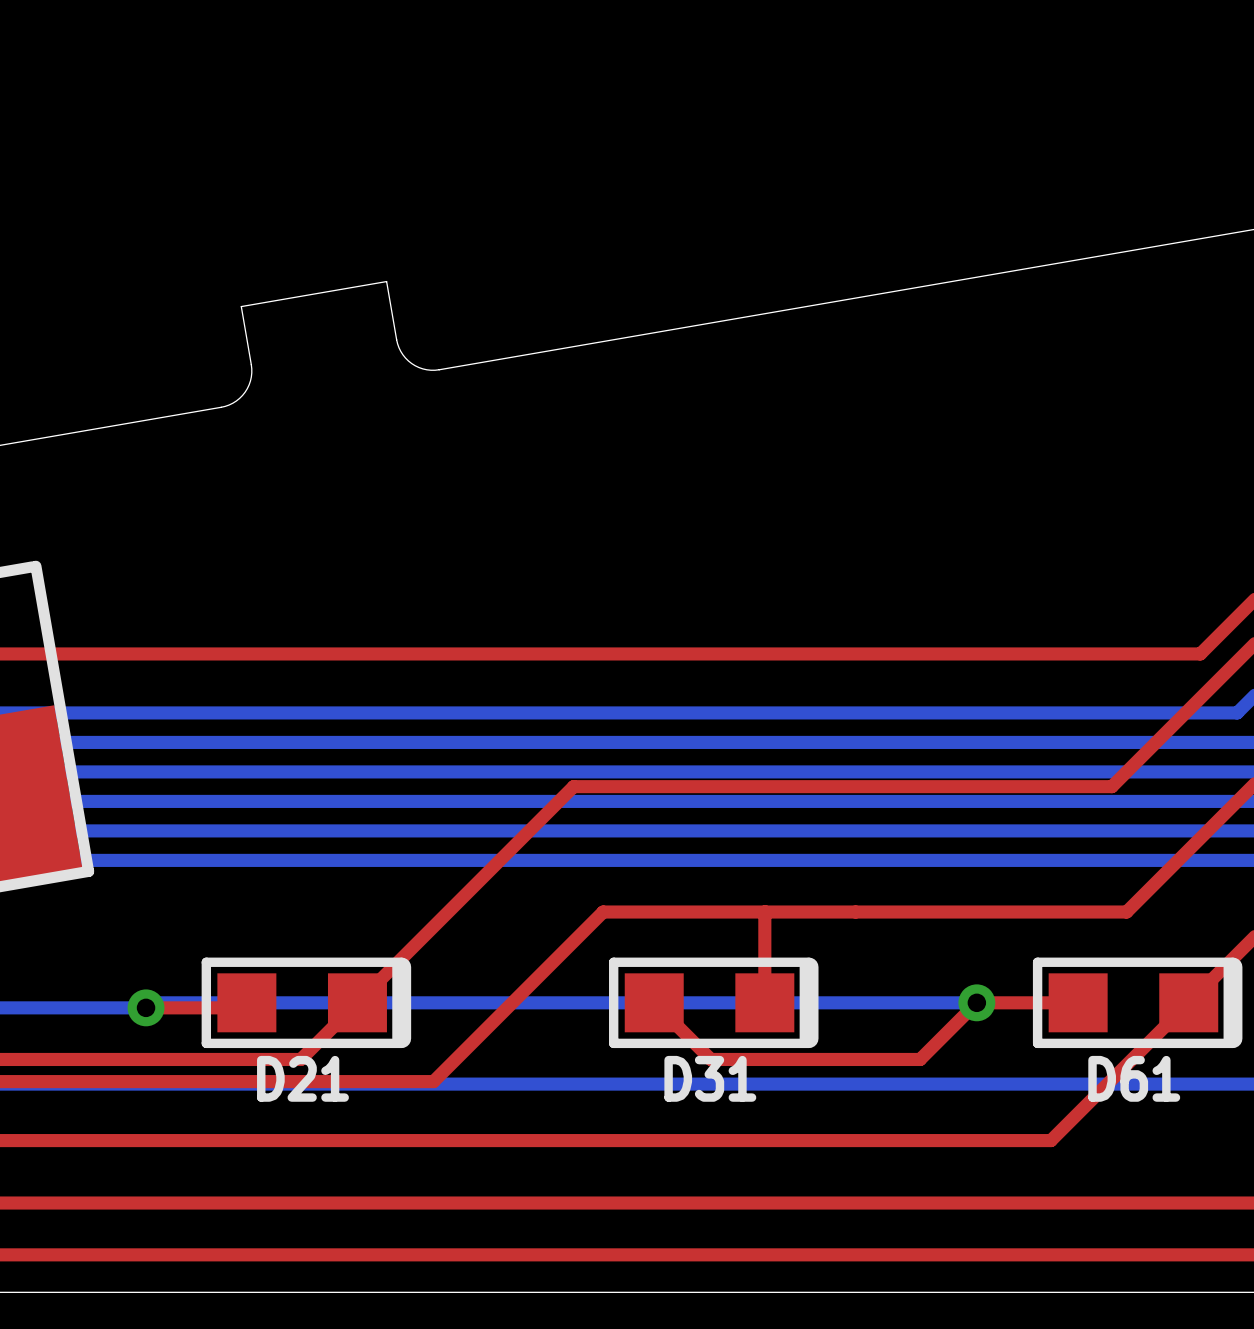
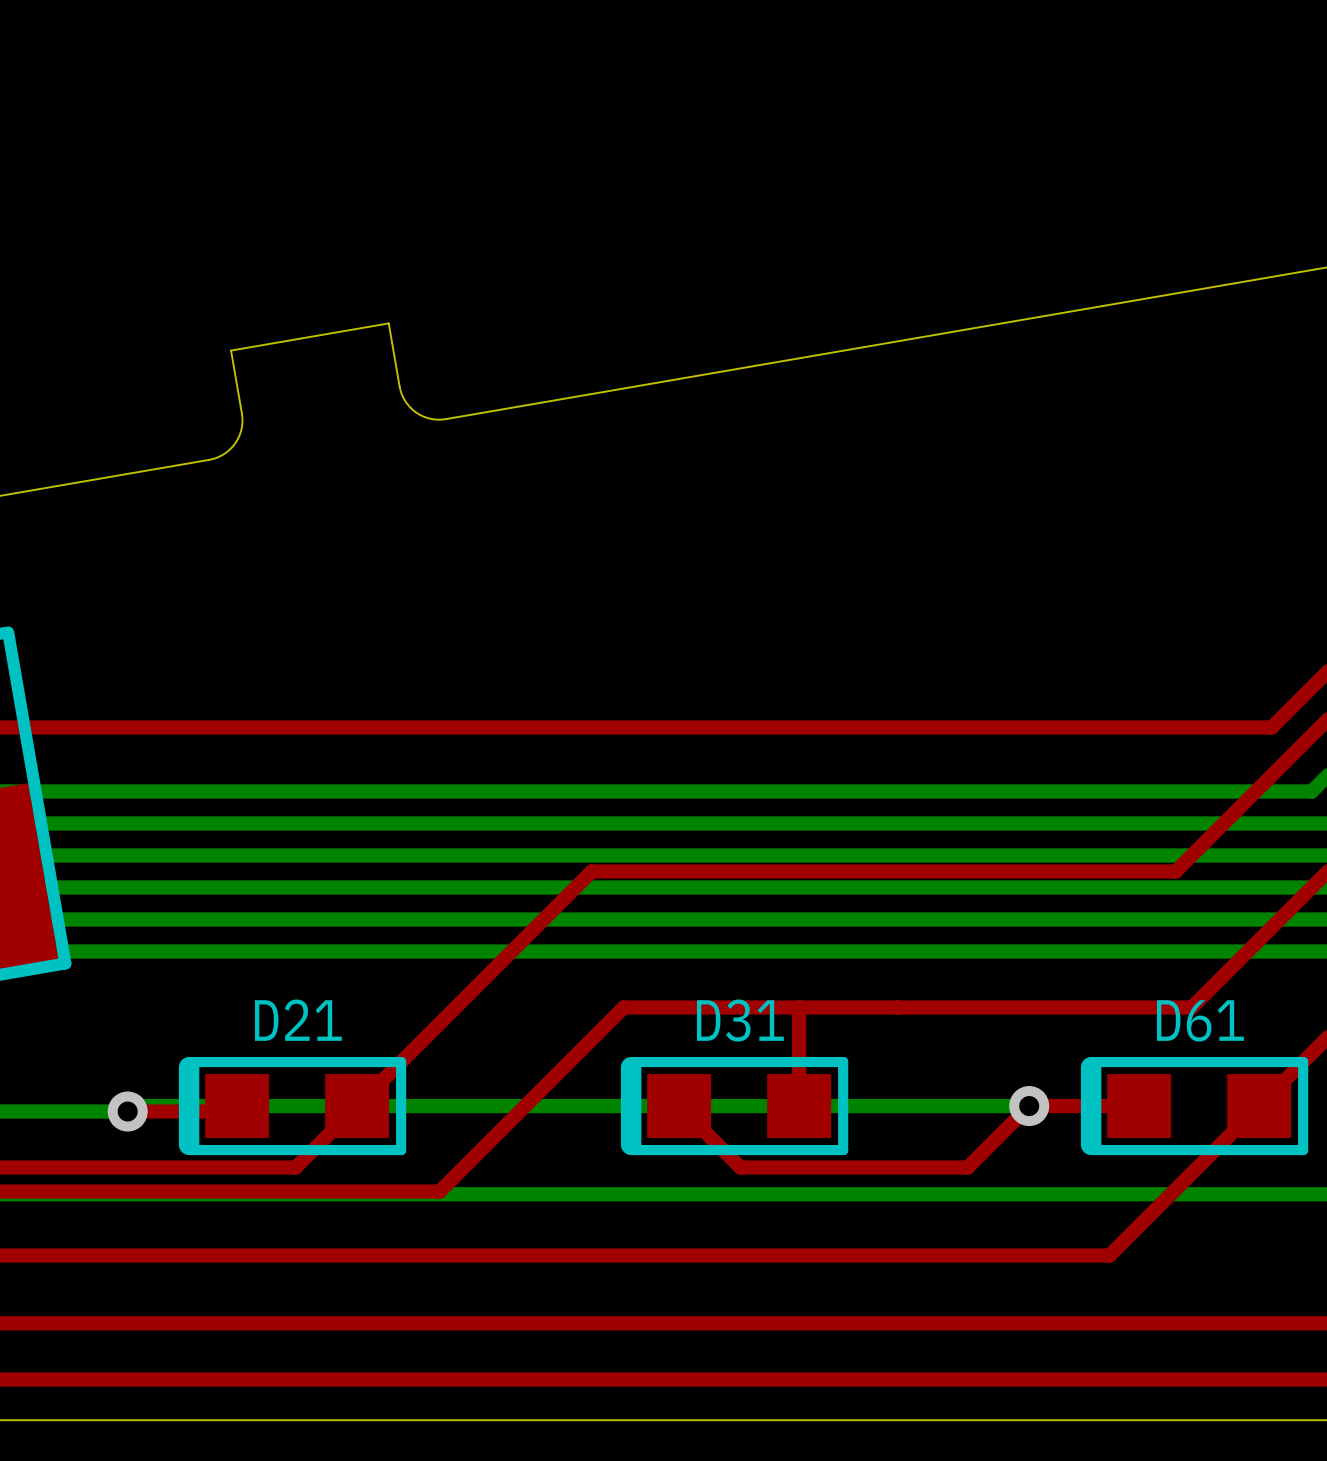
D21 rotation: 0° (306, 1002) -> 180° (292, 1106)
D31 rotation: 0° (713, 1002) -> 180° (734, 1106)
D61 rotation: 0° (1137, 1002) -> 180° (1194, 1106)

